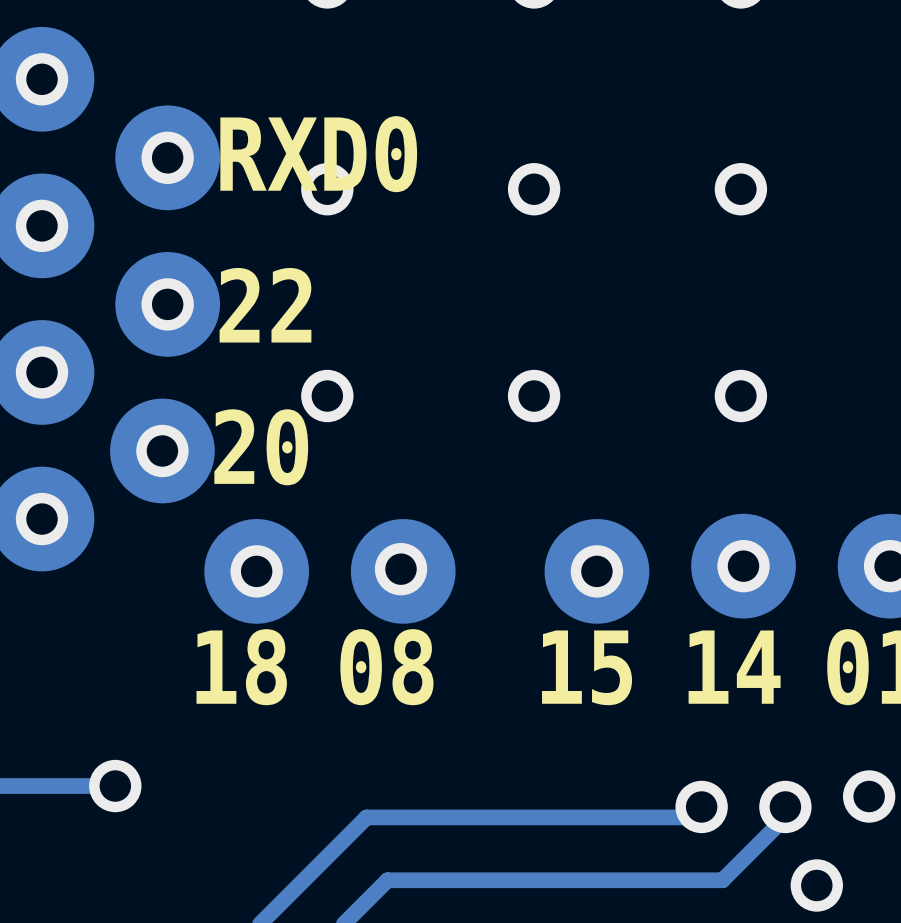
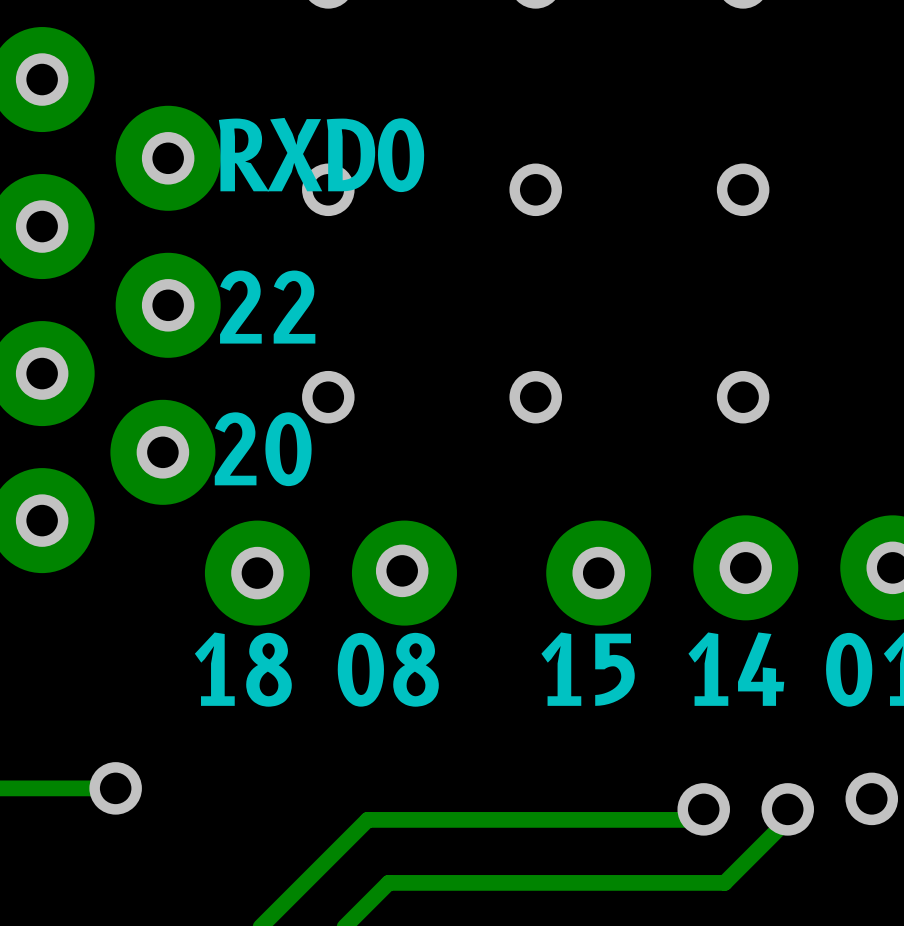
via: (816, 885) -> none

